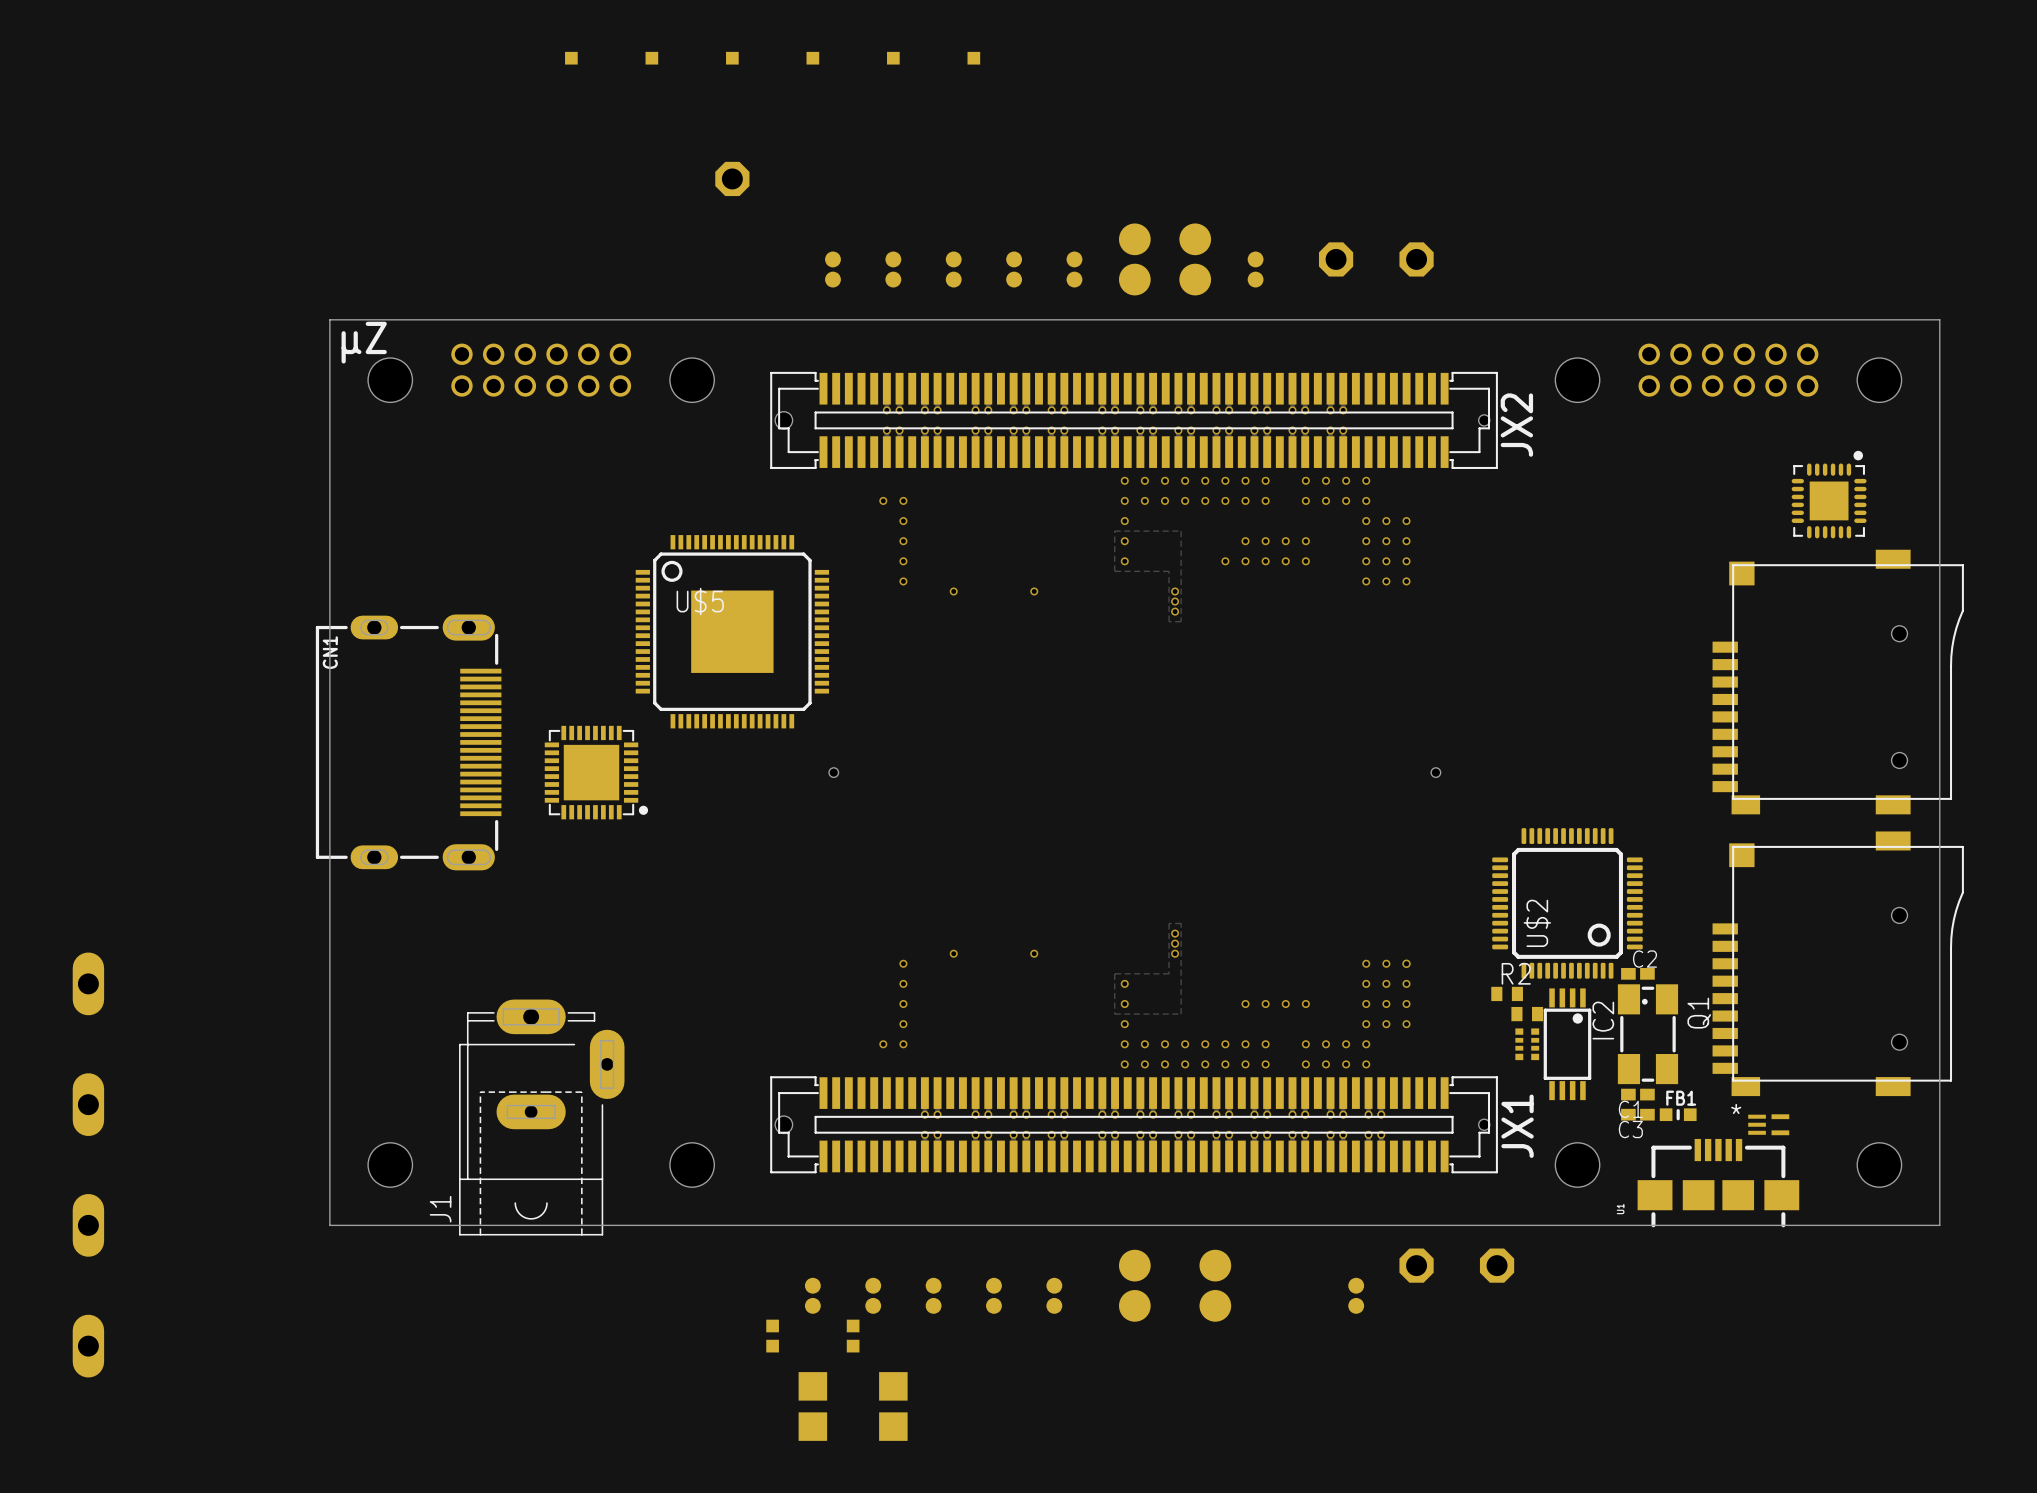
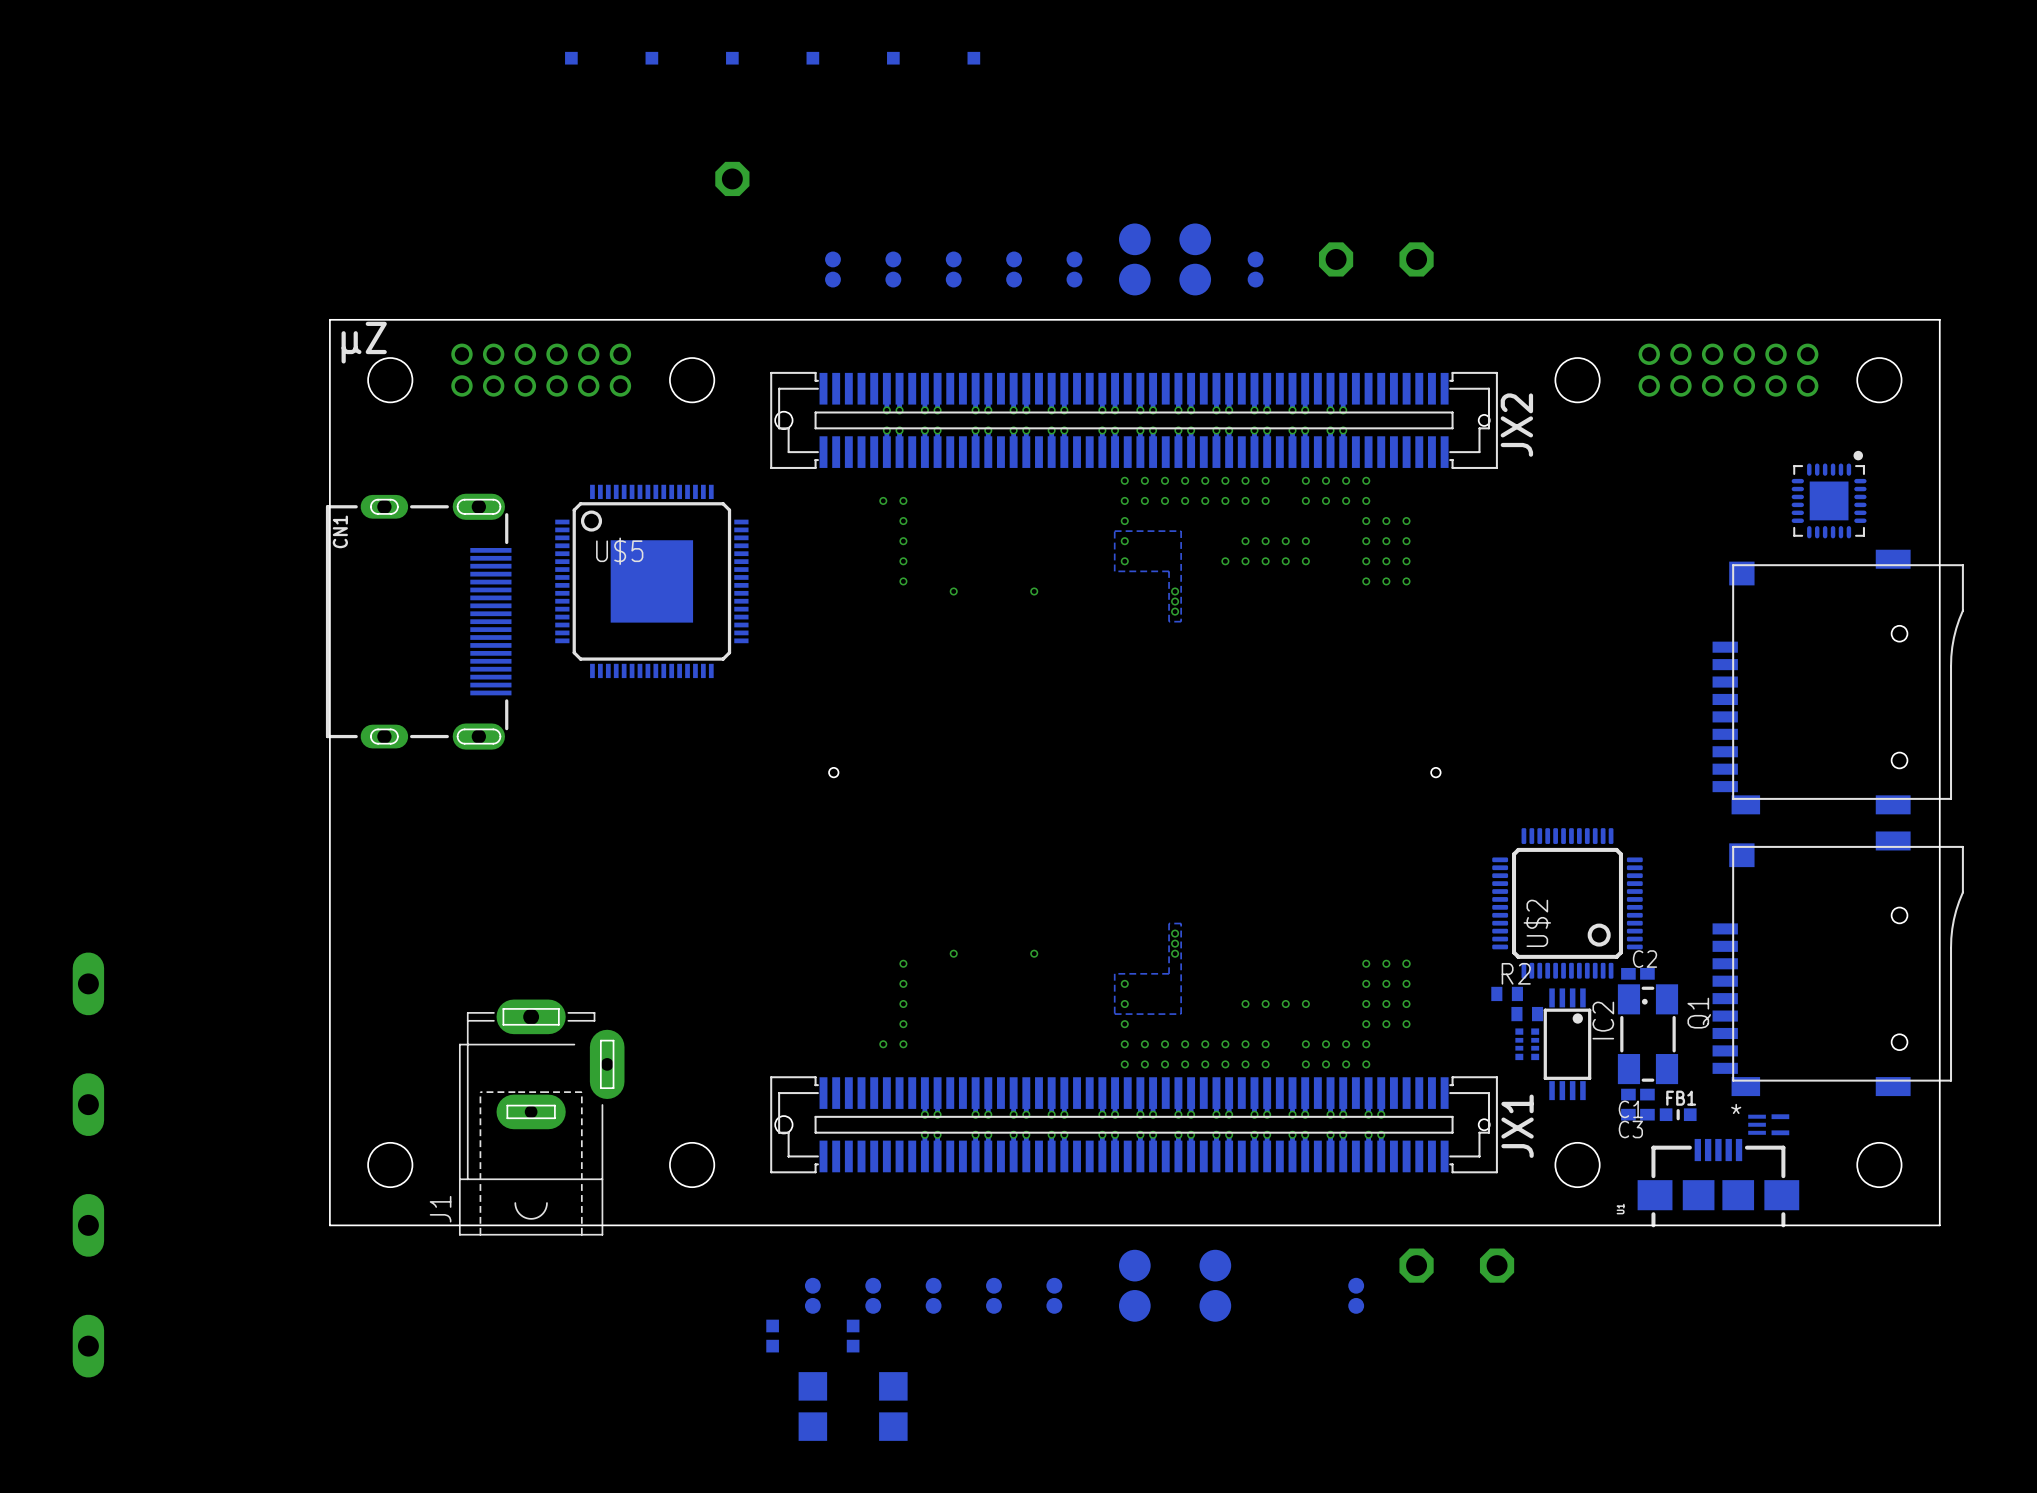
U$5 position: (732, 631) -> (651, 581)
CN1 position: (408, 742) -> (418, 621)
part: (596, 772) -> none

